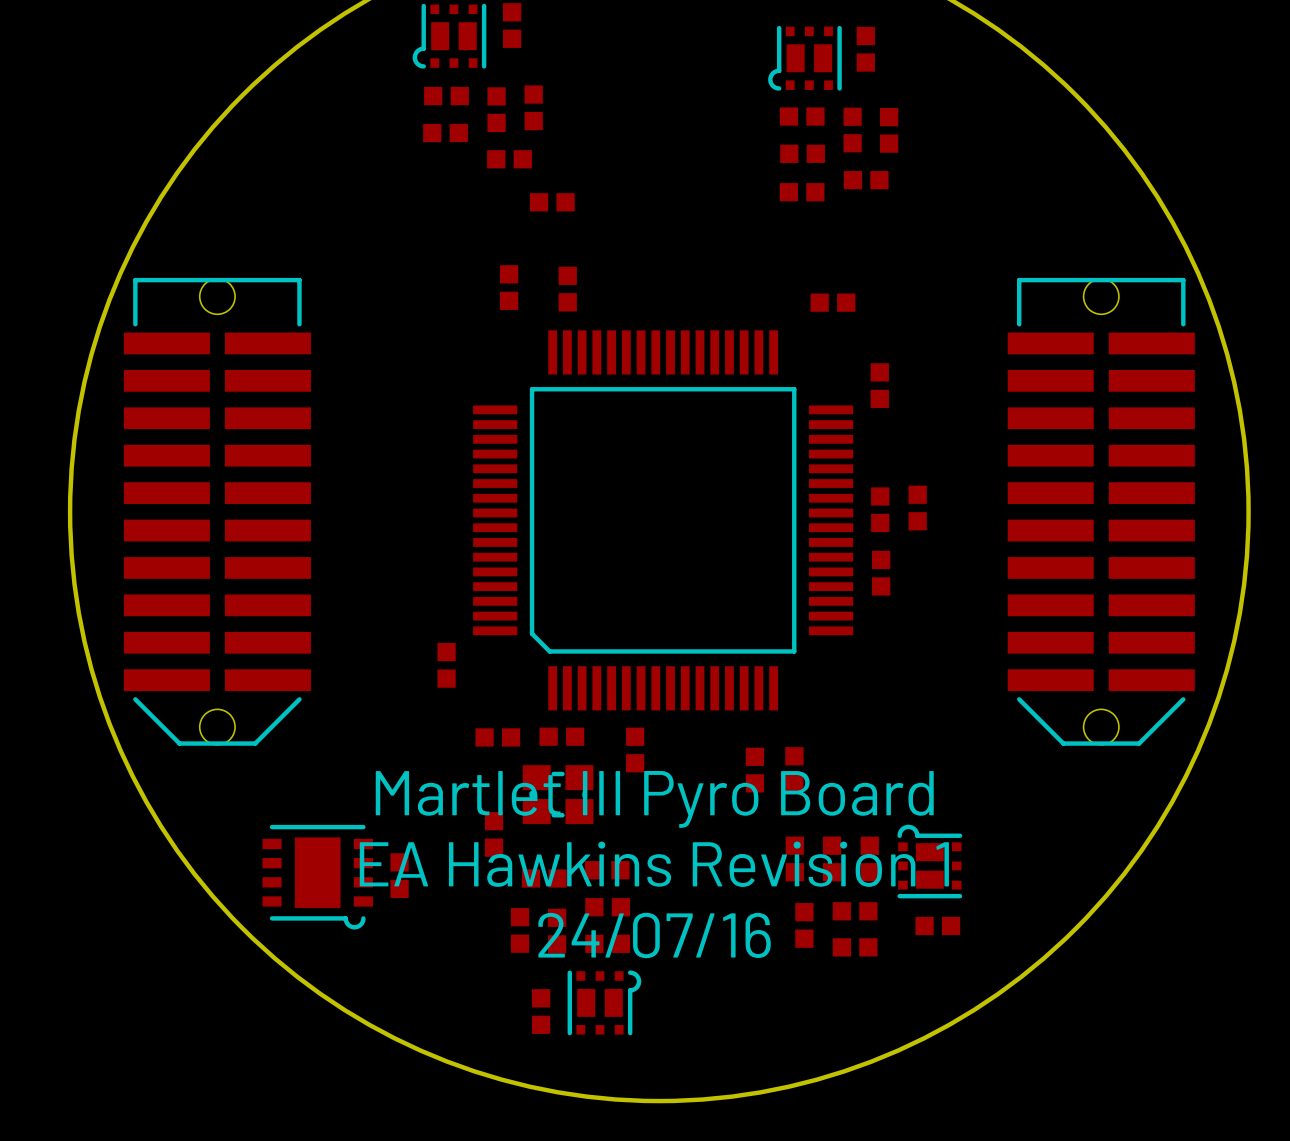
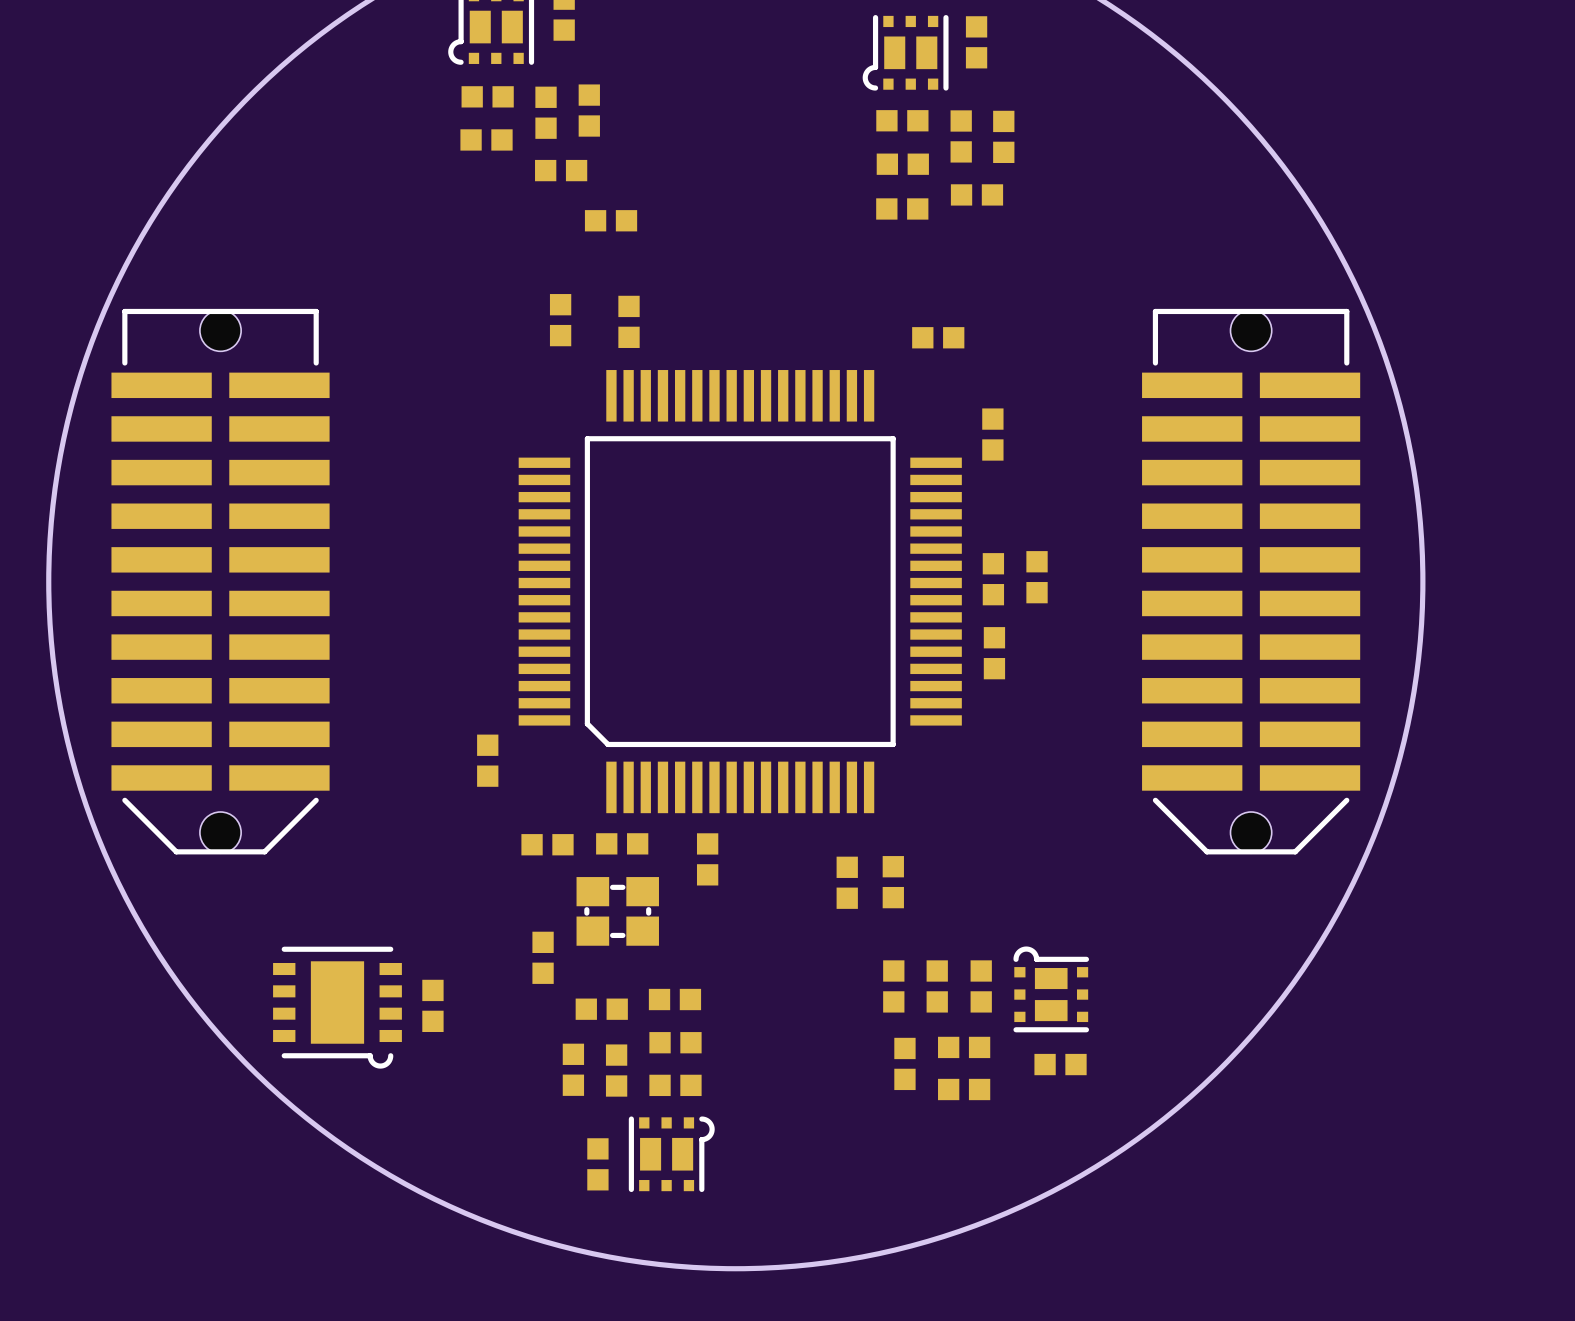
text: Martlet III Pyro Board (654, 799) -> none
text: EA Hawkins Revision 1 (654, 864) -> none
text: 24/07/16 (654, 935) -> none

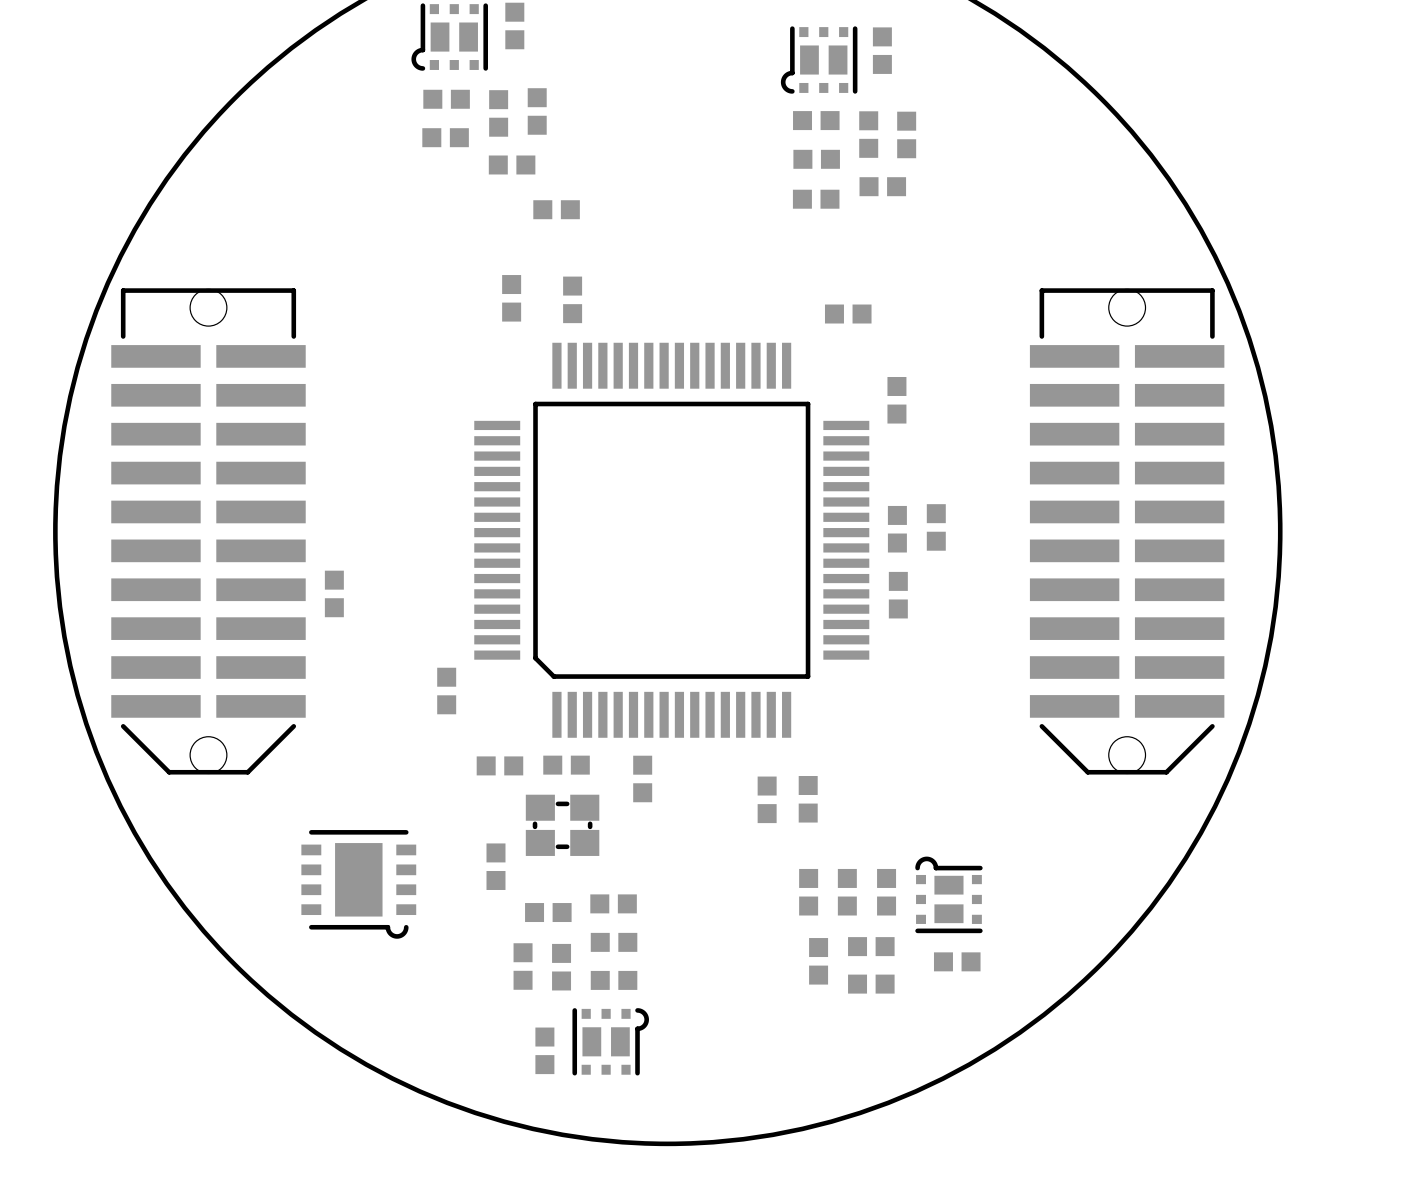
part position: (432, 1005) -> (334, 593)
part position: (337, 1007) -> (358, 884)

